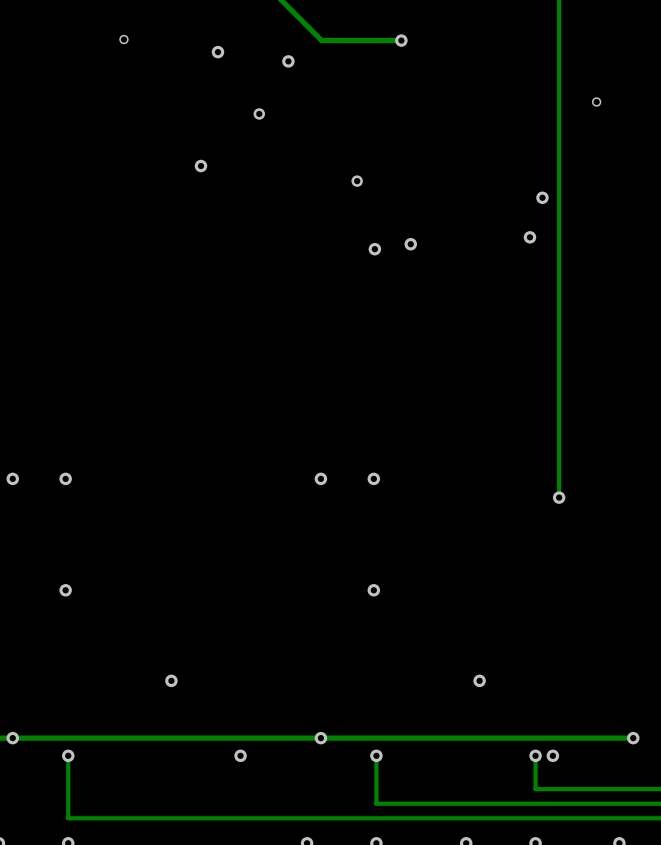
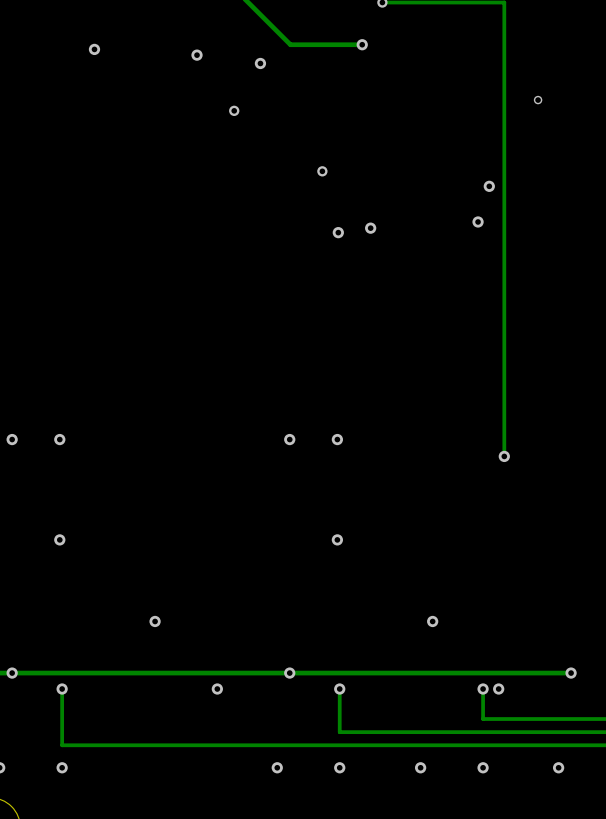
via: (123, 39) -> none
via: none -> (94, 49)
via: (200, 166) -> none

